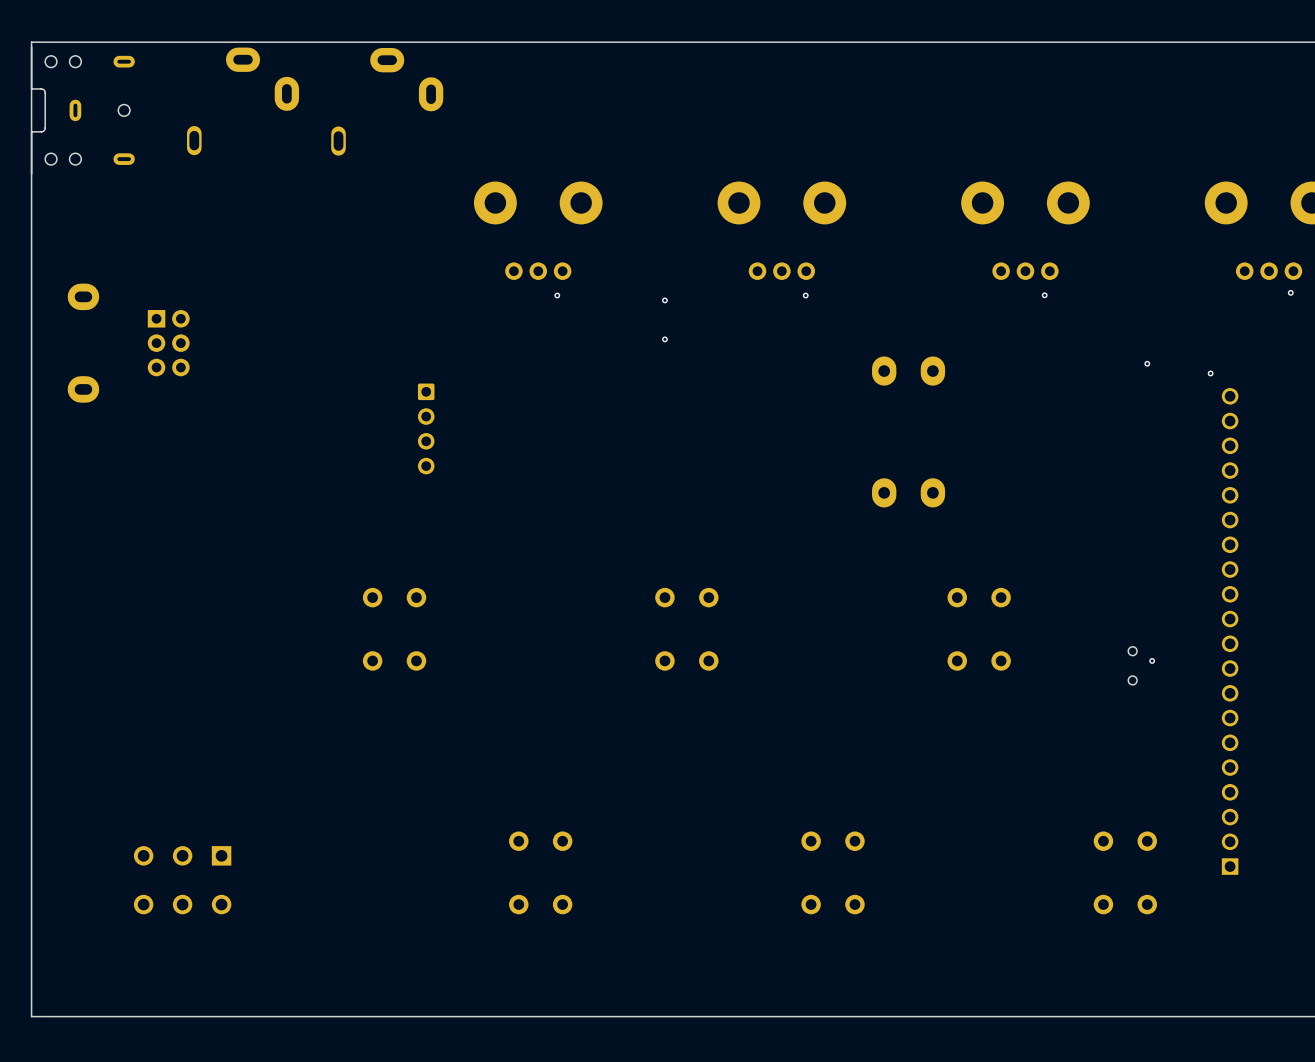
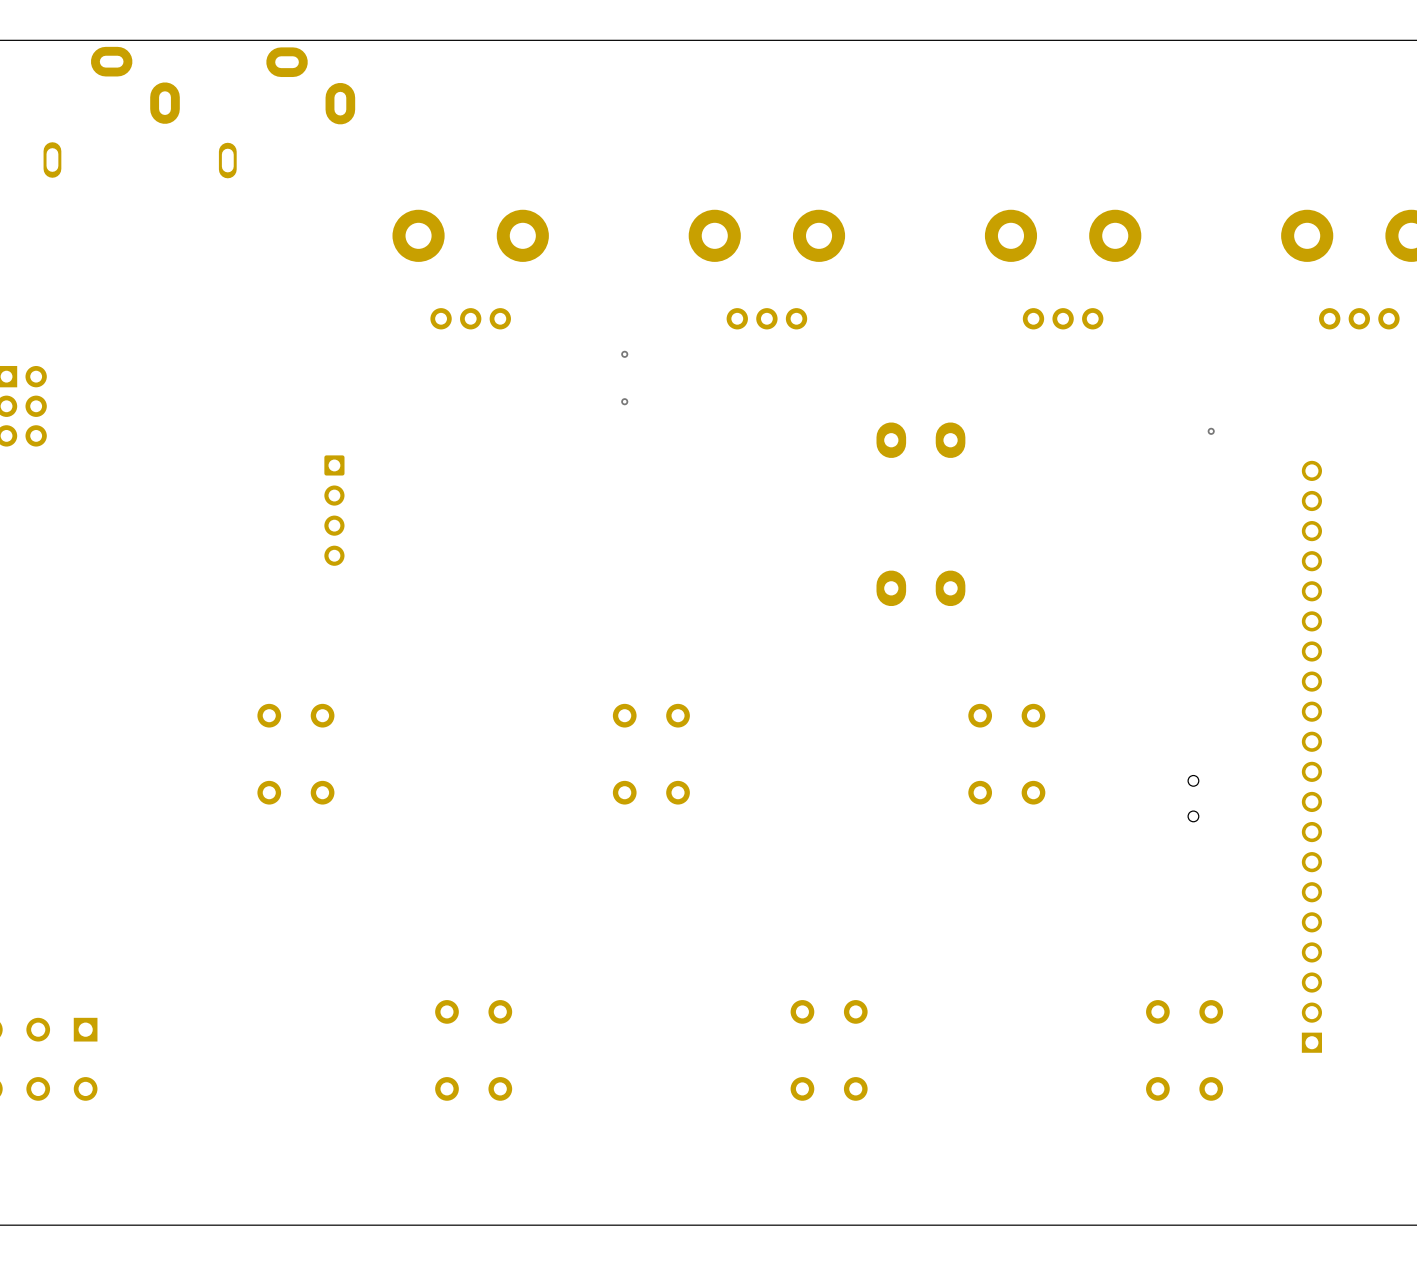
via: (1290, 292) -> none
via: (557, 295) -> none
via: (805, 295) -> none
via: (1044, 295) -> none
via: (1210, 373) -> none
via: (1152, 660) -> none

